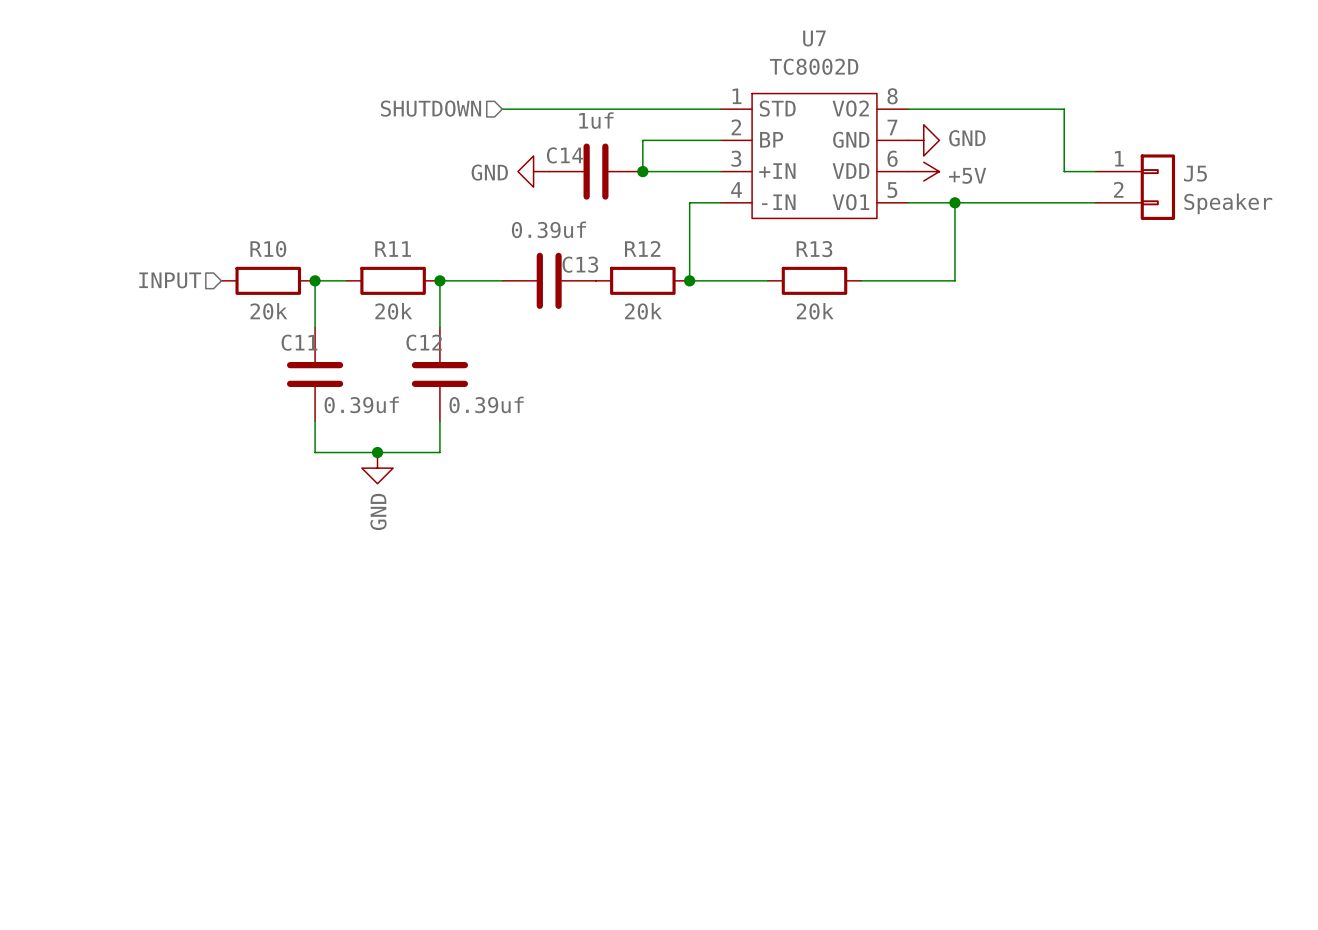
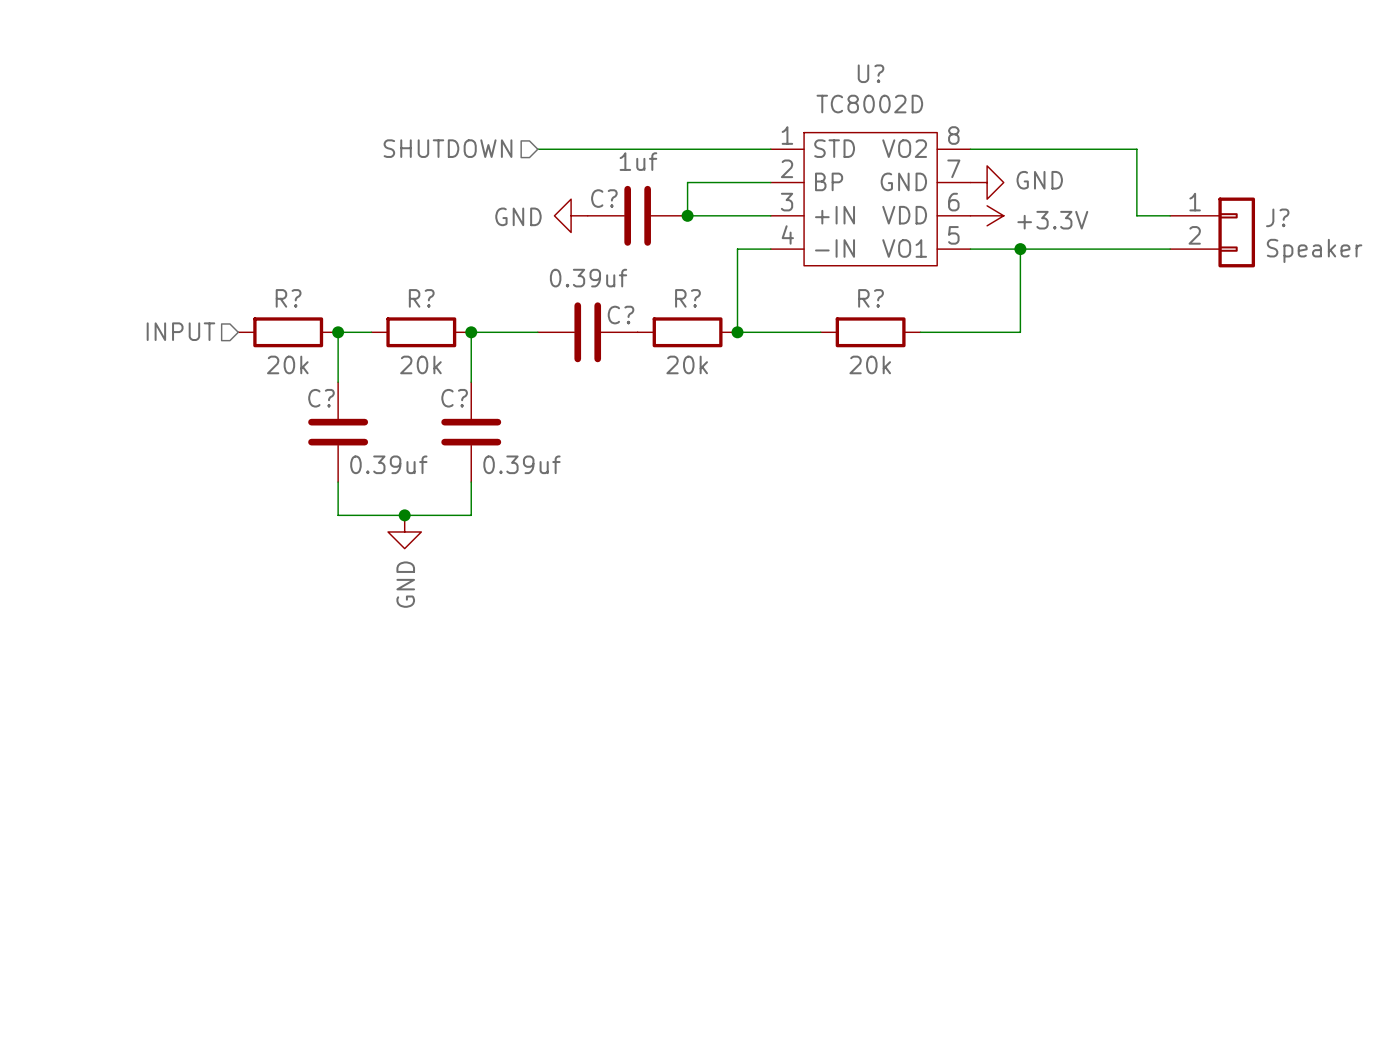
U7 name: U7 (814, 38) -> U? (871, 73)
C14 name: C14 (565, 155) -> C? (604, 198)
power symbol: +5V (923, 171) -> +3.3V (987, 215)
J5 name: J5 (1195, 173) -> J? (1277, 217)
R12 name: R12 (642, 248) -> R? (687, 298)
R10 name: R10 (268, 249) -> R? (288, 298)
R11 name: R11 (393, 249) -> R? (421, 298)
R13 name: R13 (814, 249) -> R? (871, 298)
C13 name: C13 (580, 264) -> C? (621, 315)
C11 name: C11 (299, 342) -> C? (321, 398)
C12 name: C12 (424, 342) -> C? (454, 398)

